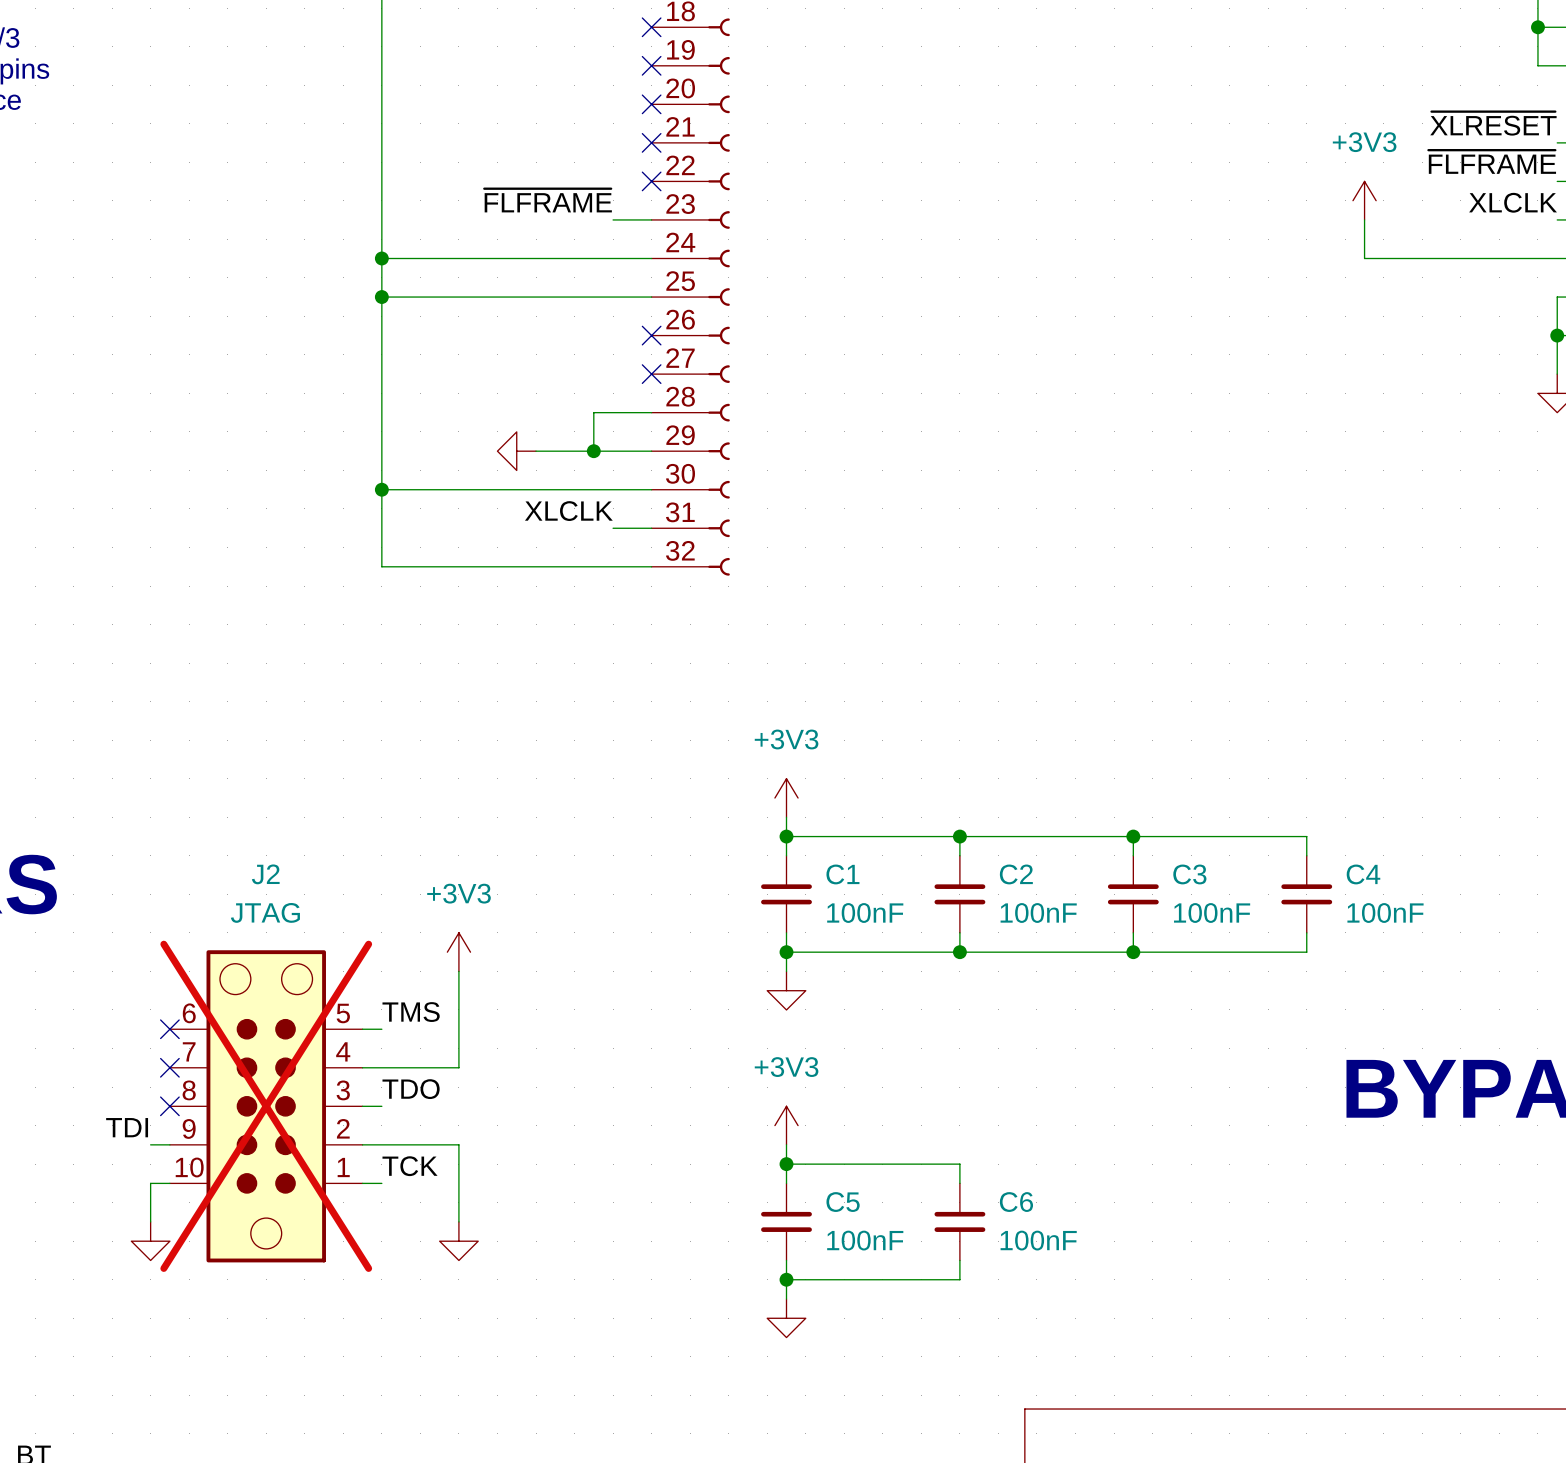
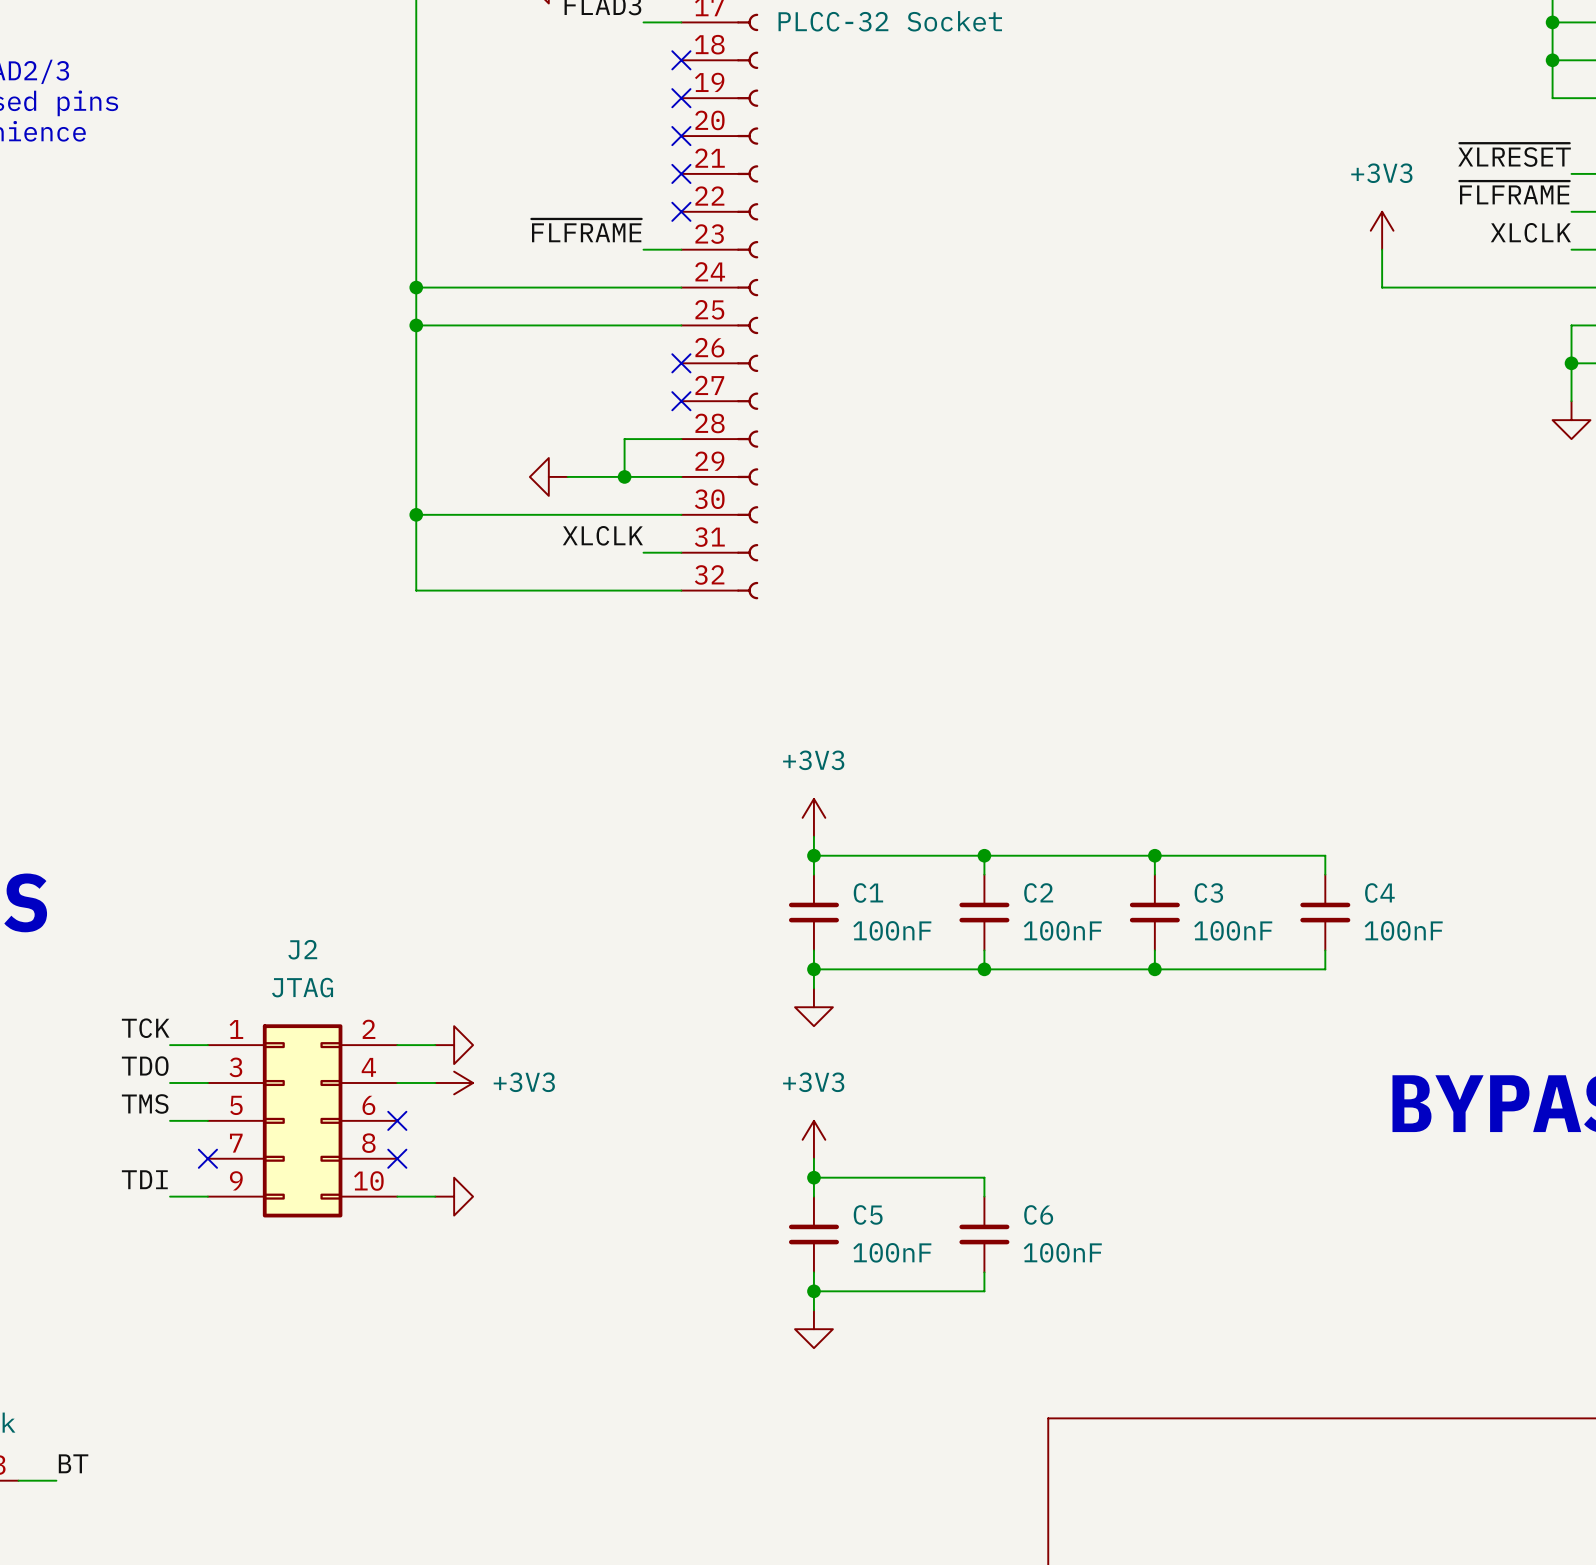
J2 name position: J2 (265, 874) -> J2 (302, 949)
J2 value position: JTAG (265, 912) -> JTAG (302, 987)
J2 symbol: [169, 950, 363, 1263] -> [207, 1024, 398, 1218]
power symbol rotation: 0° (458, 952) -> 90° clockwise (454, 1082)
power symbol position: +3V3 (458, 952) -> +3V3 (454, 1082)
wire: (458, 971) (458, 1067) (401, 1067) -> none
label position: TMS (411, 1012) -> TMS (145, 1103)
wire: none -> (170, 1045) (207, 1045)
no-connect mark: (169, 1029) -> none
power symbol: none -> (454, 1045)
wire: none -> (170, 1082) (207, 1082)
no-connect mark: (169, 1067) -> none
label position: TDO (411, 1089) -> TDO (145, 1066)
wire: none -> (170, 1120) (207, 1120)
no-connect mark: (169, 1106) -> none
J2 do-not-place cross: (266, 1106) -> none
wire: (362, 1106) (381, 1106) -> (416, 1196) (435, 1196)
no-connect mark: none -> (397, 1120)
label position: TDI (127, 1127) -> TDI (144, 1179)
wire: (150, 1144) (169, 1144) -> (416, 1045) (435, 1045)
no-connect mark: none -> (207, 1158)
wire: (362, 1144) (458, 1144) (458, 1221) -> none
no-connect mark: none -> (397, 1158)
label position: TCK (410, 1166) -> TCK (145, 1028)
wire: (150, 1183) (150, 1221) -> (188, 1196) (170, 1196)
power symbol: (150, 1241) -> none
power symbol rotation: 0° (458, 1241) -> 90° counterclockwise (454, 1196)
power symbol position: (458, 1241) -> (454, 1196)

